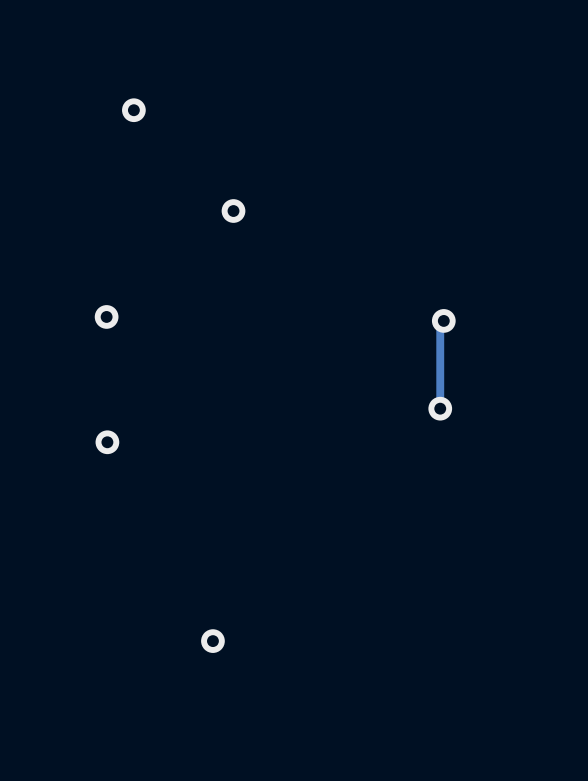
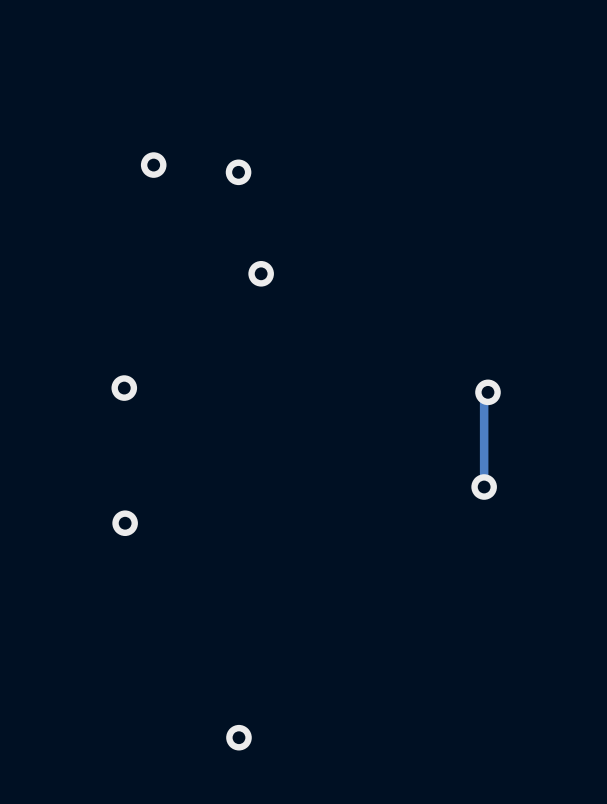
via: none -> (238, 172)

